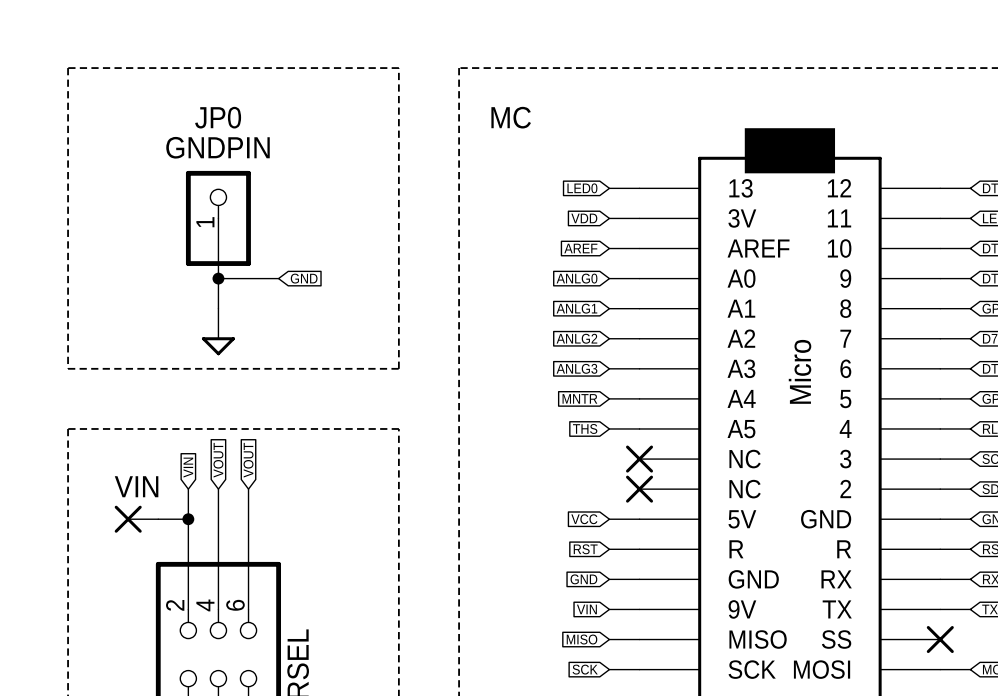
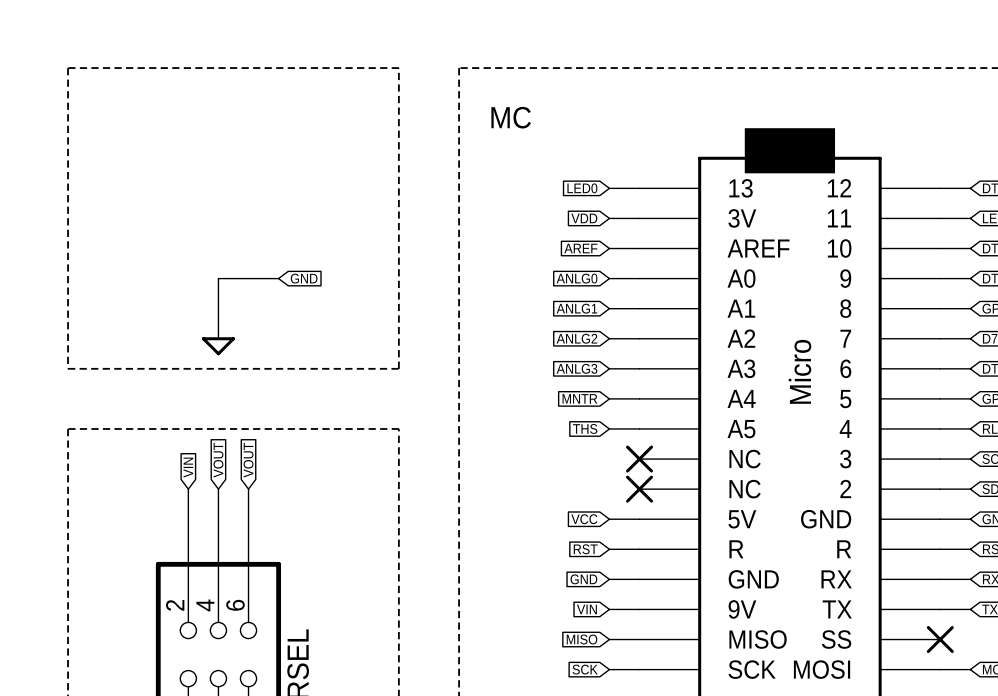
wire: (218, 218) (218, 278) -> none
JP0: GNDPIN (218, 218) -> none
junction: (218, 278) -> none
VIN: (136, 519) -> none
wire: (158, 519) (188, 519) -> none
junction: (188, 519) -> none

